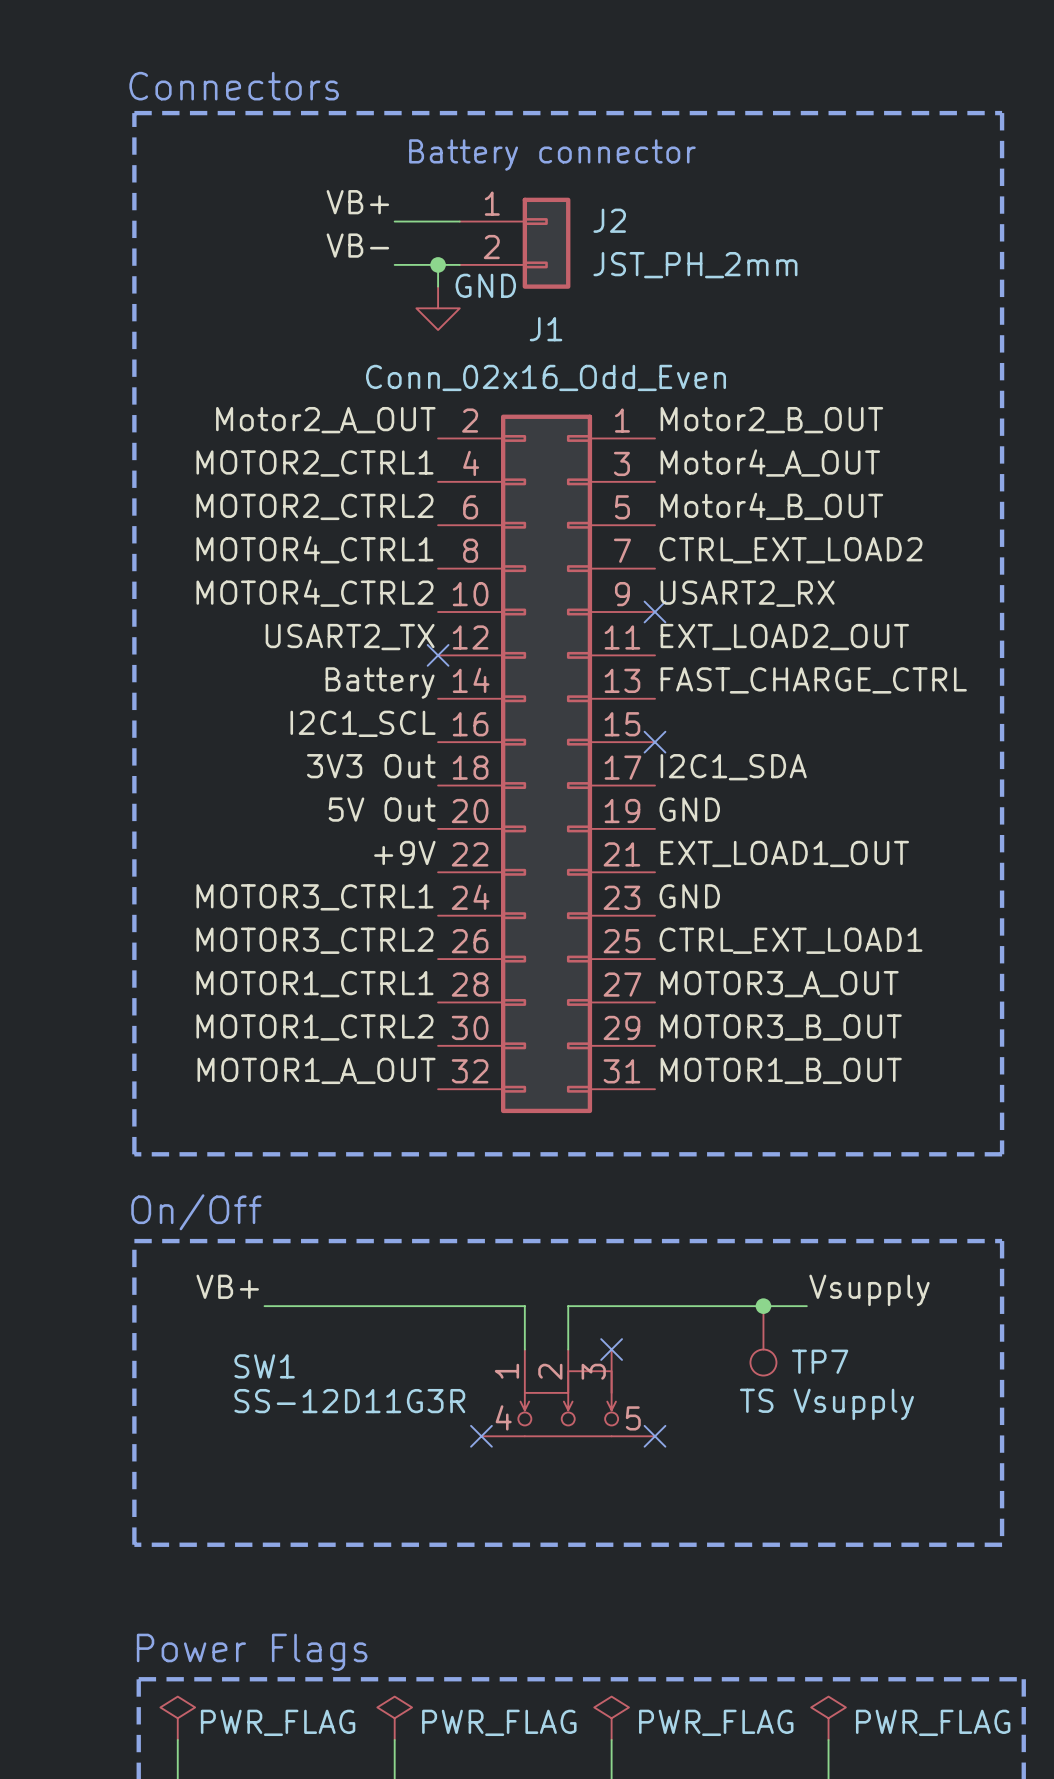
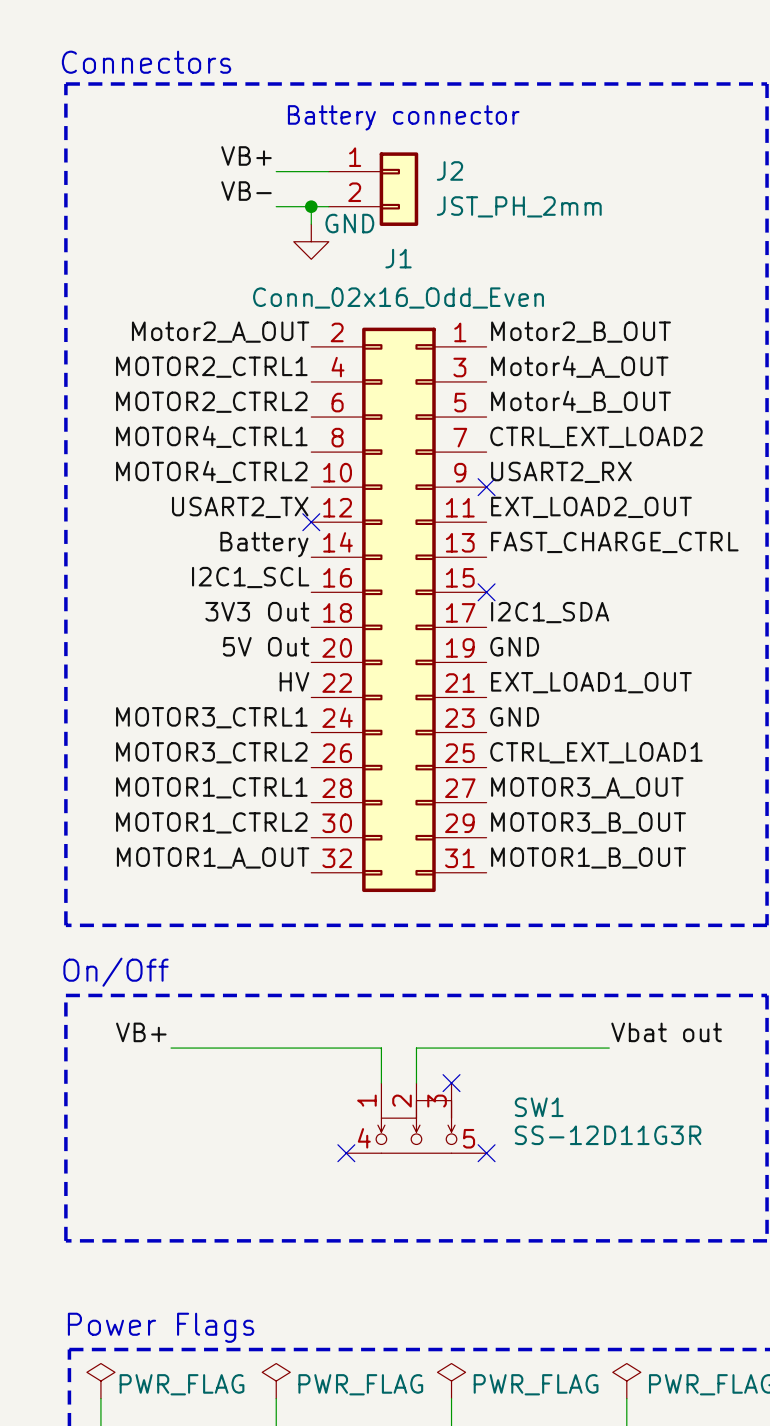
label: +9V (404, 852) -> HV (294, 681)
label: Vsupply (869, 1290) -> Vbat out (666, 1032)
junction: (763, 1306) -> none
TP7: TS Vsupply (763, 1340) -> none
SW1 name position: SW1 (264, 1366) -> SW1 (539, 1107)
SW1 value position: SS-12D11G3R (349, 1401) -> SS-12D11G3R (608, 1135)

